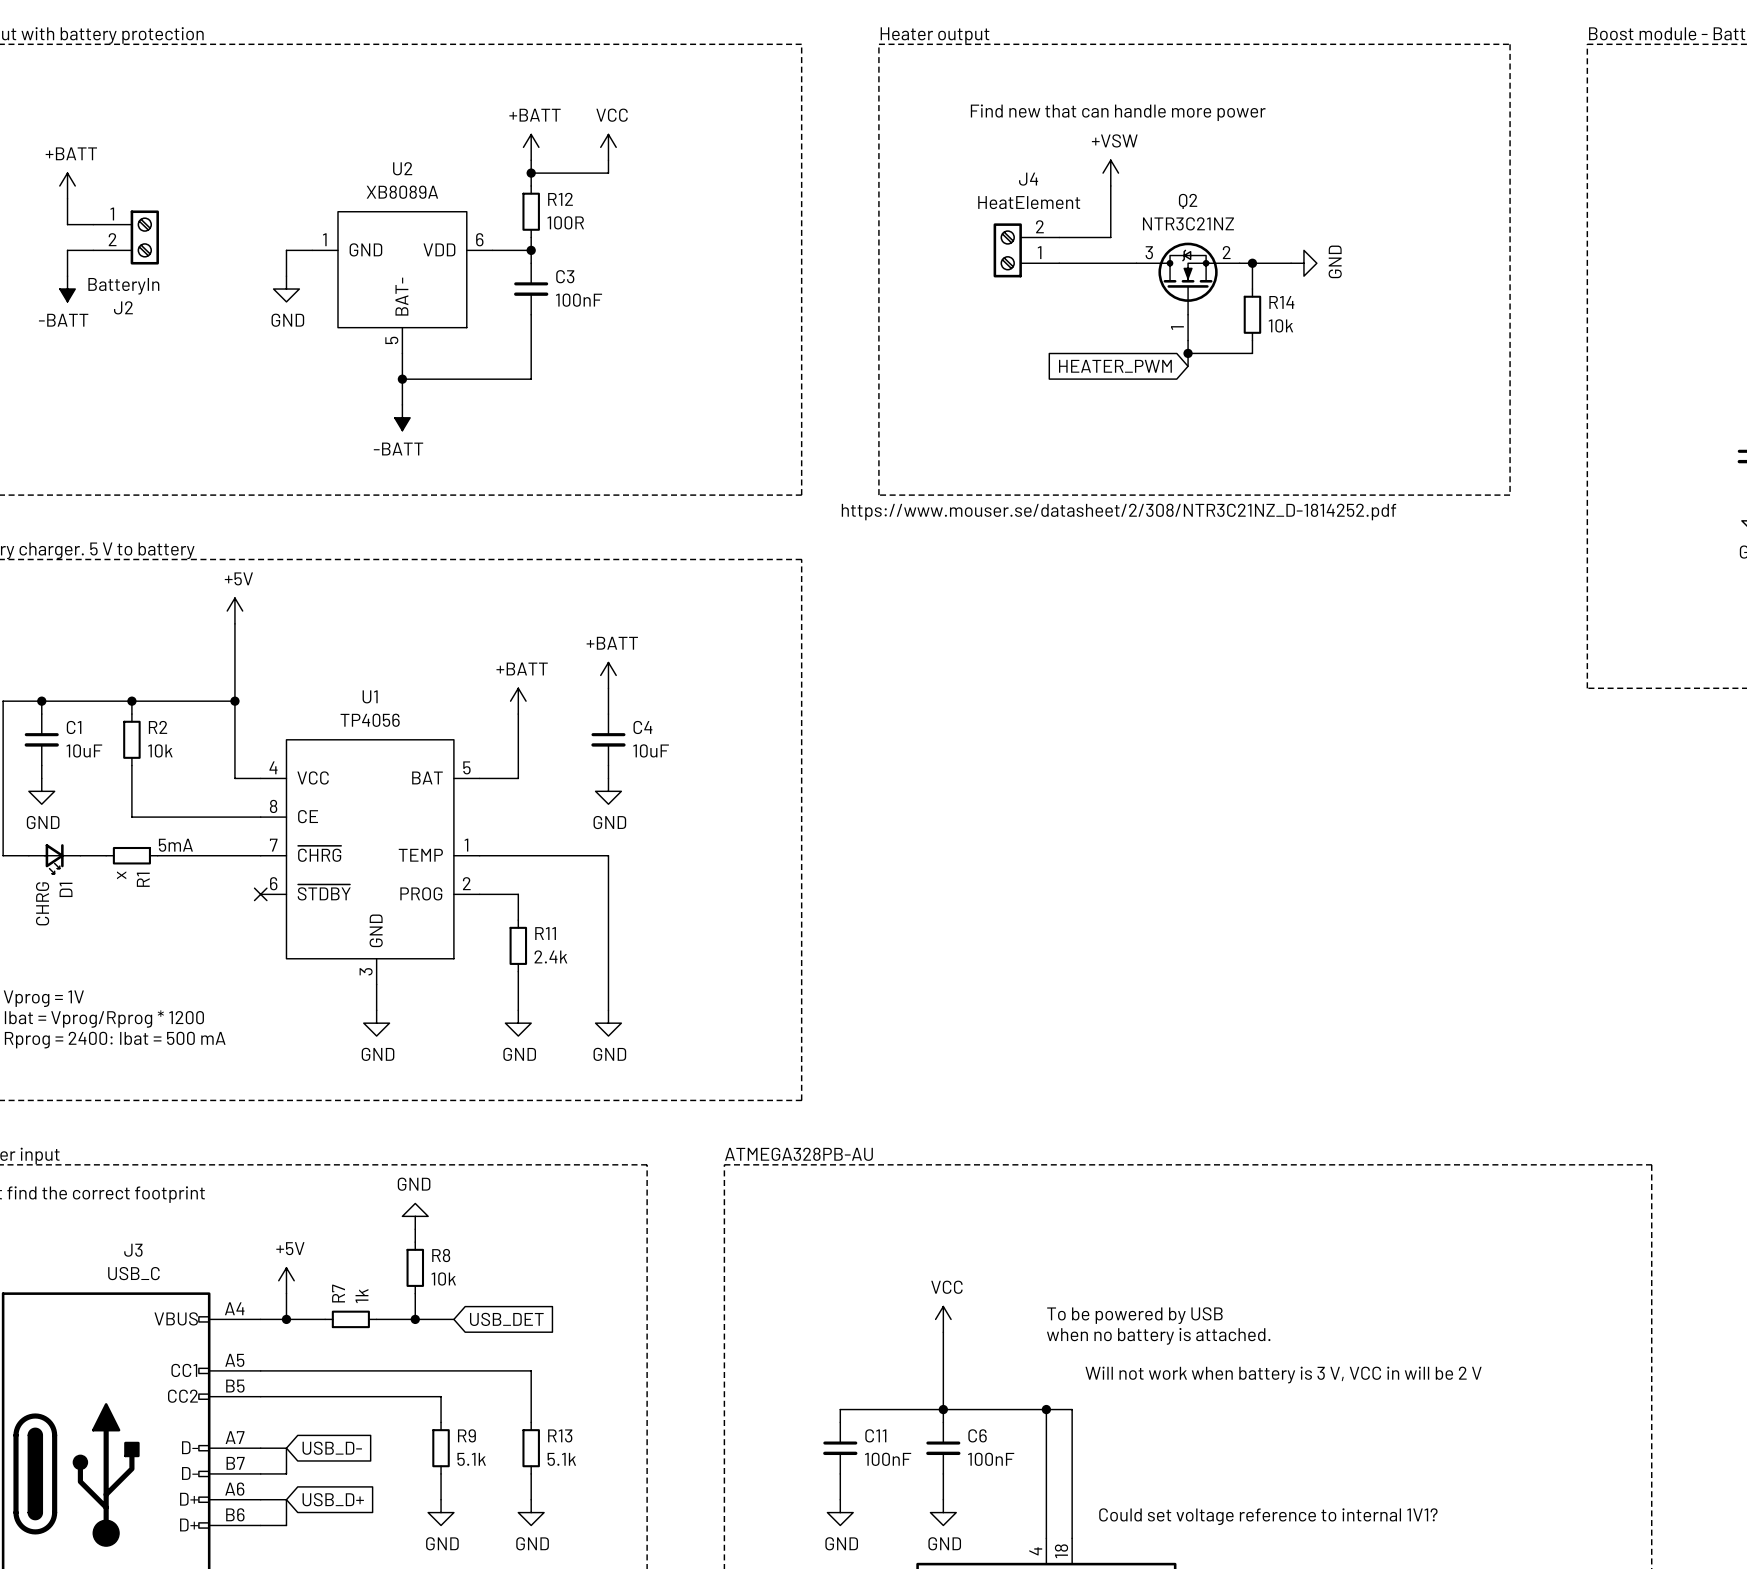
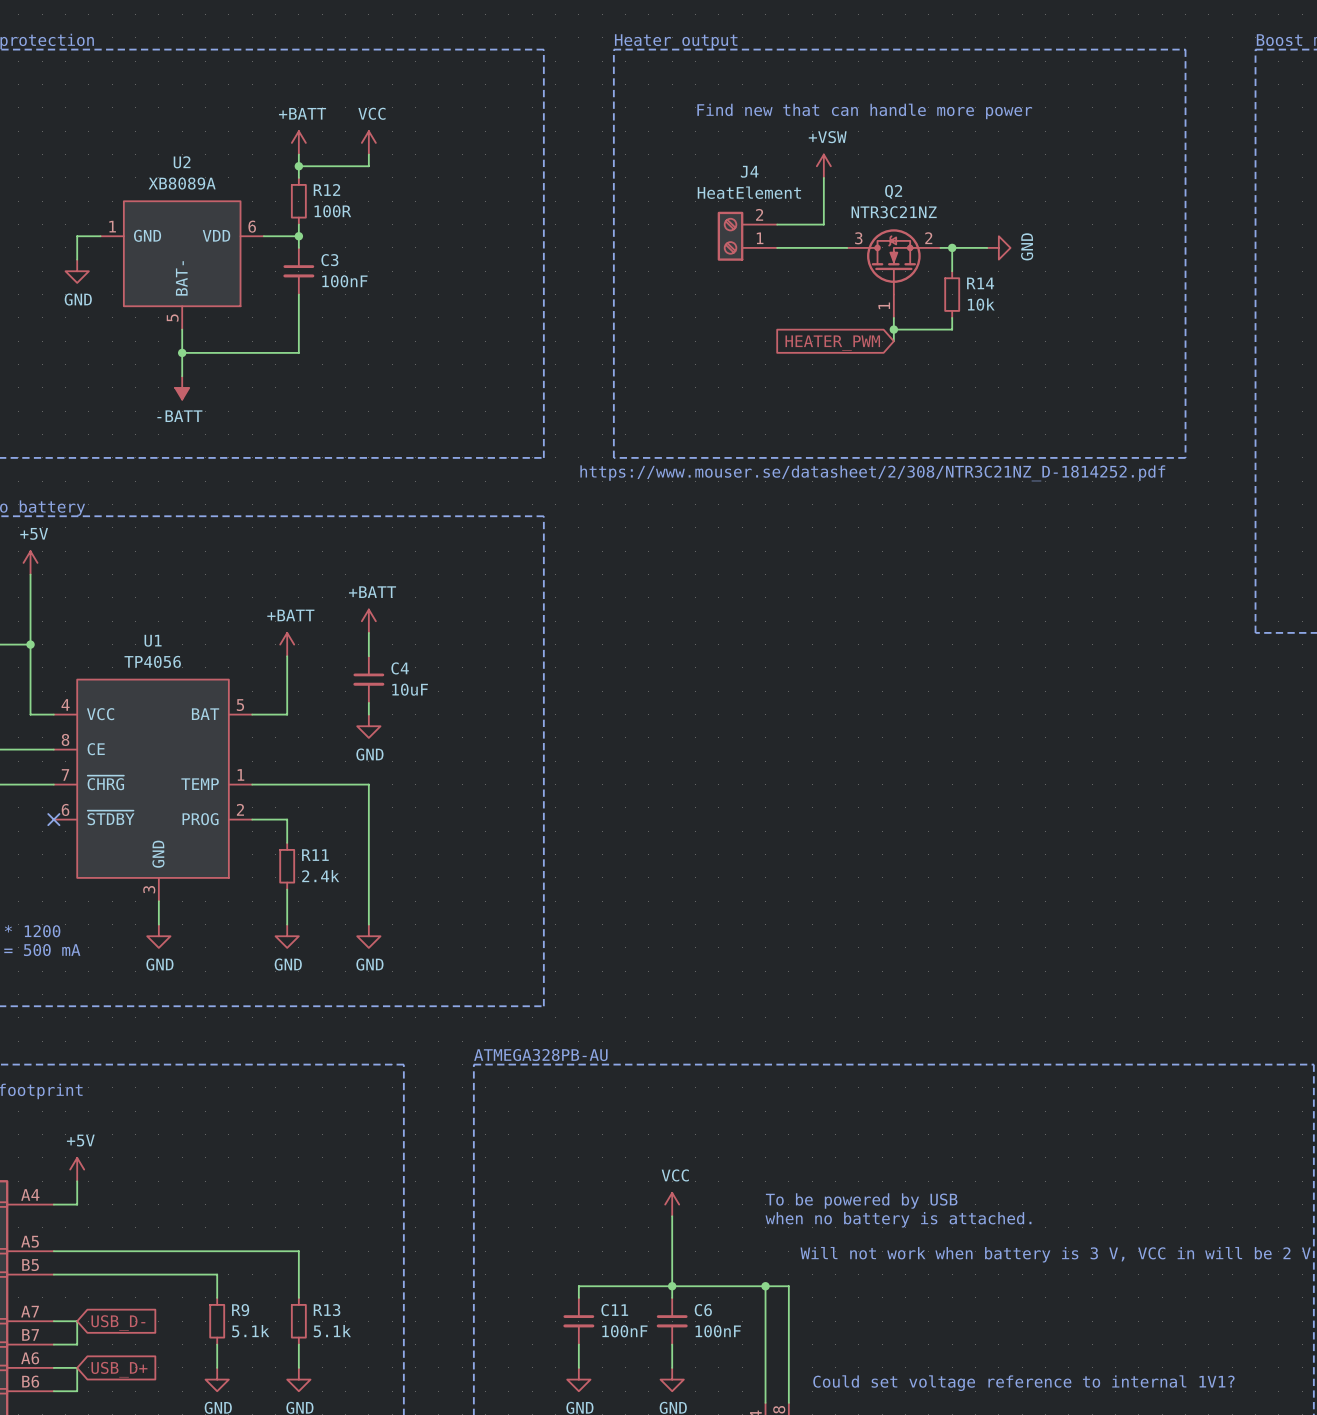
power symbol: GND (415, 1216) -> none
wire: (415, 1229) (415, 1242) -> none
R8: 10k (415, 1267) -> none
wire: (415, 1293) (415, 1319) -> none
wire: (286, 1319) (325, 1319) -> none
junction: (286, 1319) -> none
R7: 1k (350, 1319) -> none
wire: (376, 1319) (453, 1319) -> none
junction: (415, 1319) -> none
global label: USB_DET (506, 1319) -> none

